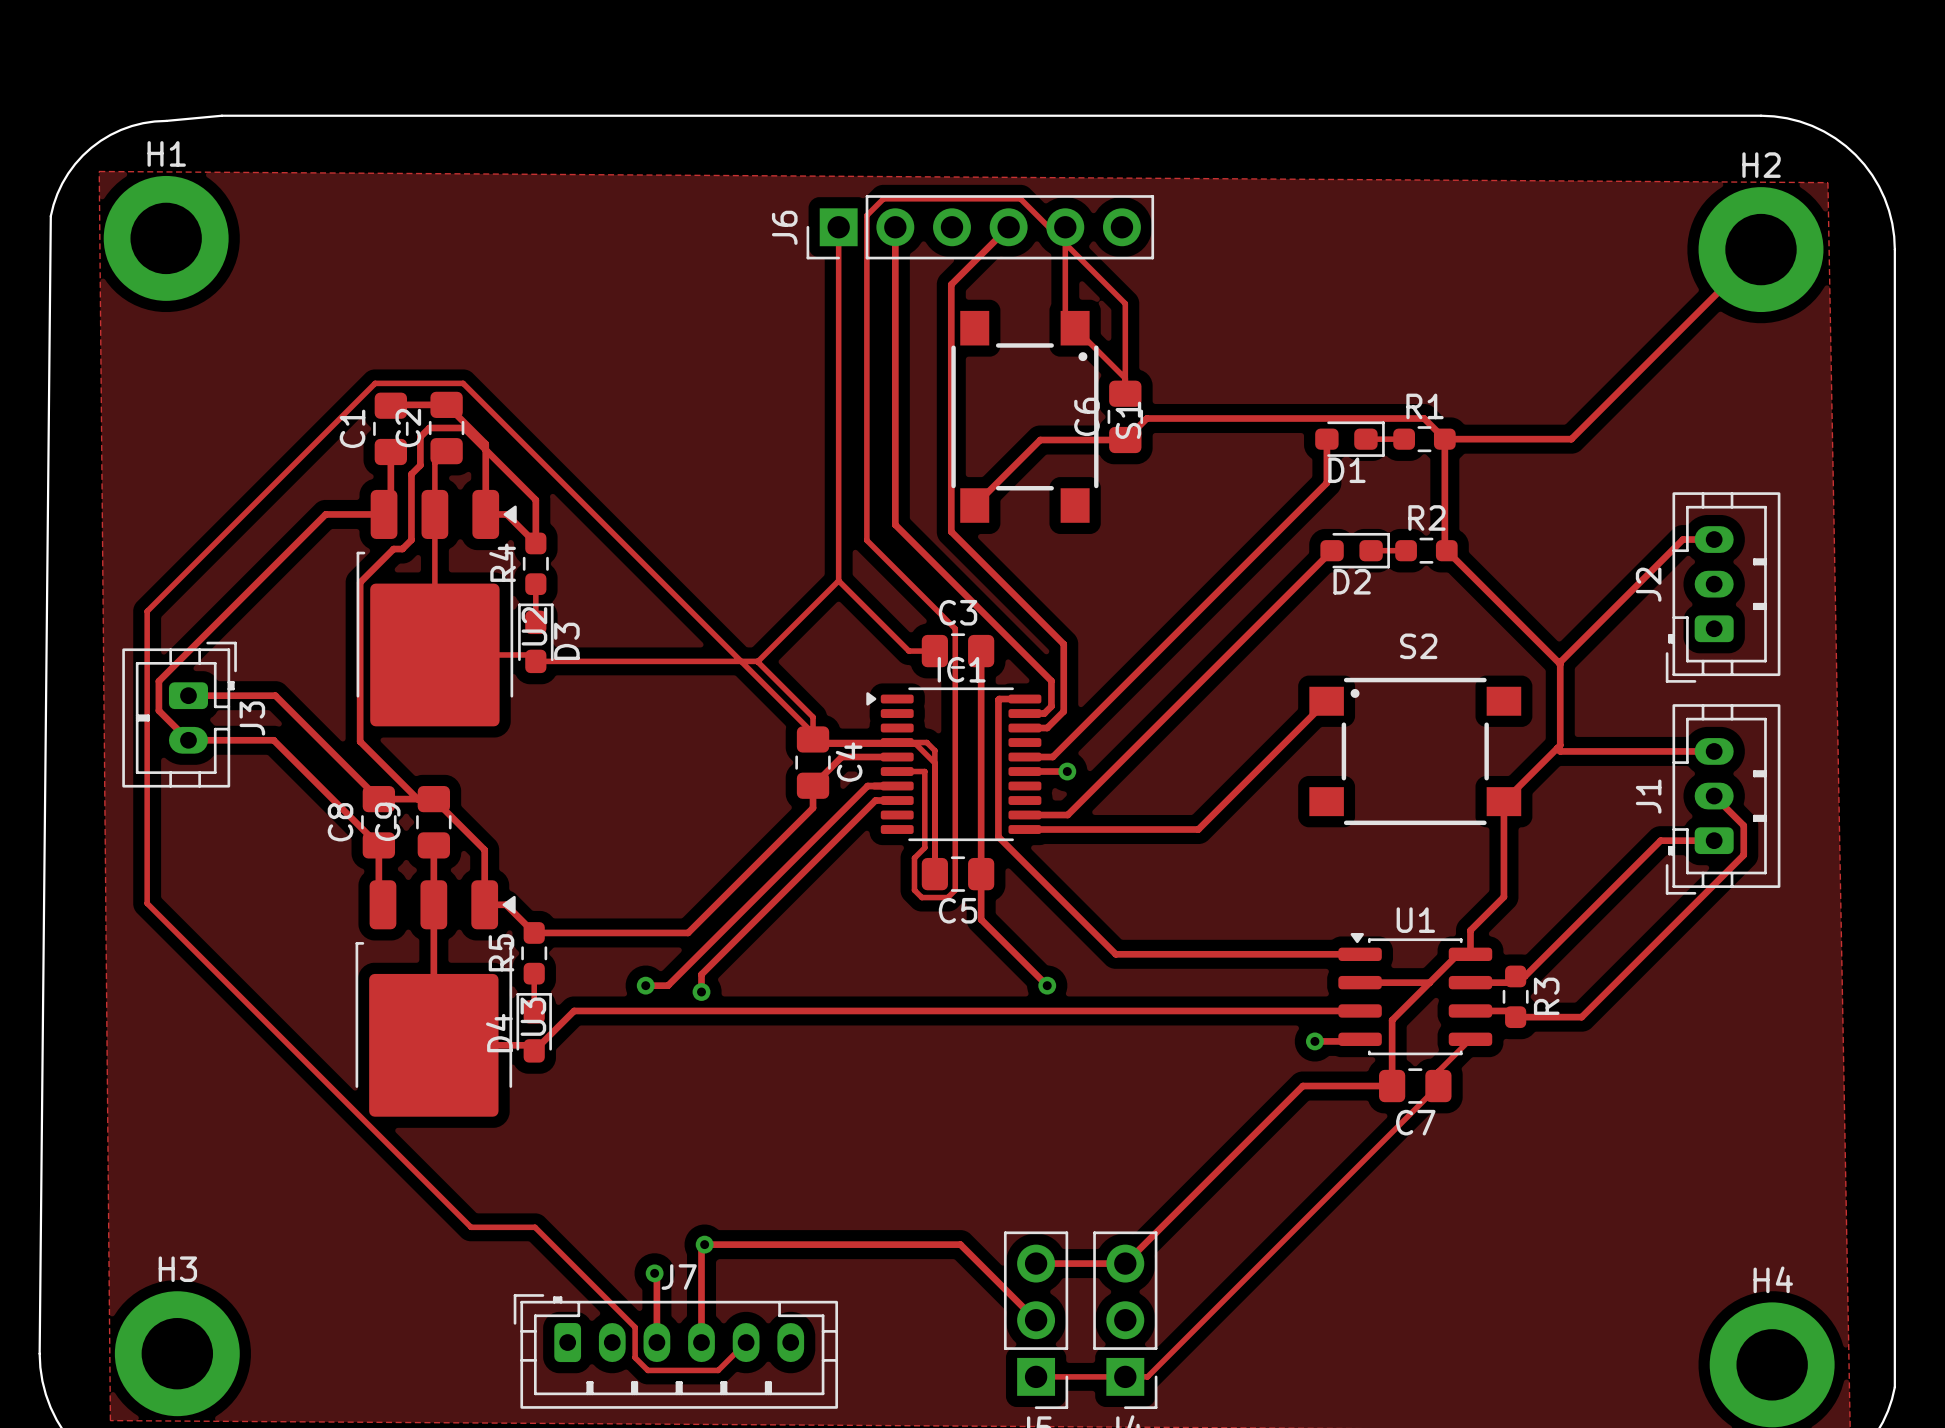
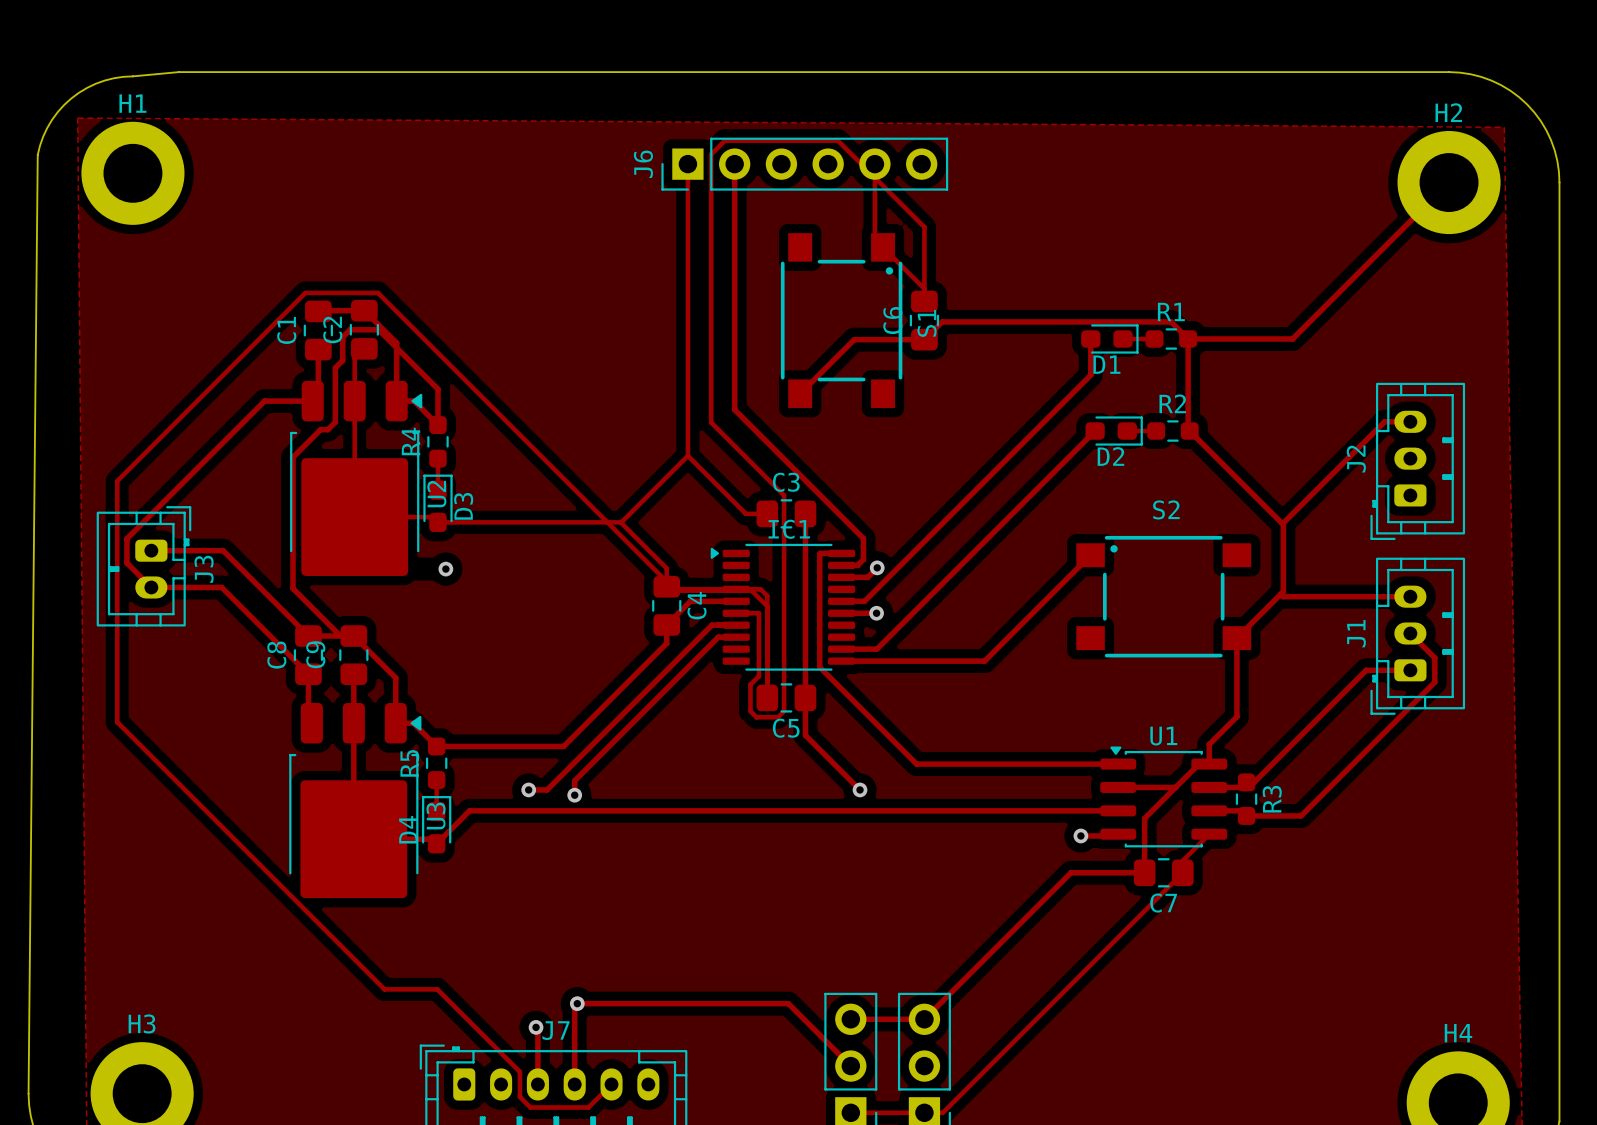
track: (1008, 227) (951, 284) (951, 531) (1063, 644) (1063, 711) (1047, 728) -> (877, 567) (867, 577) (860, 577)
via: none -> (877, 567)
via: none -> (445, 569)

